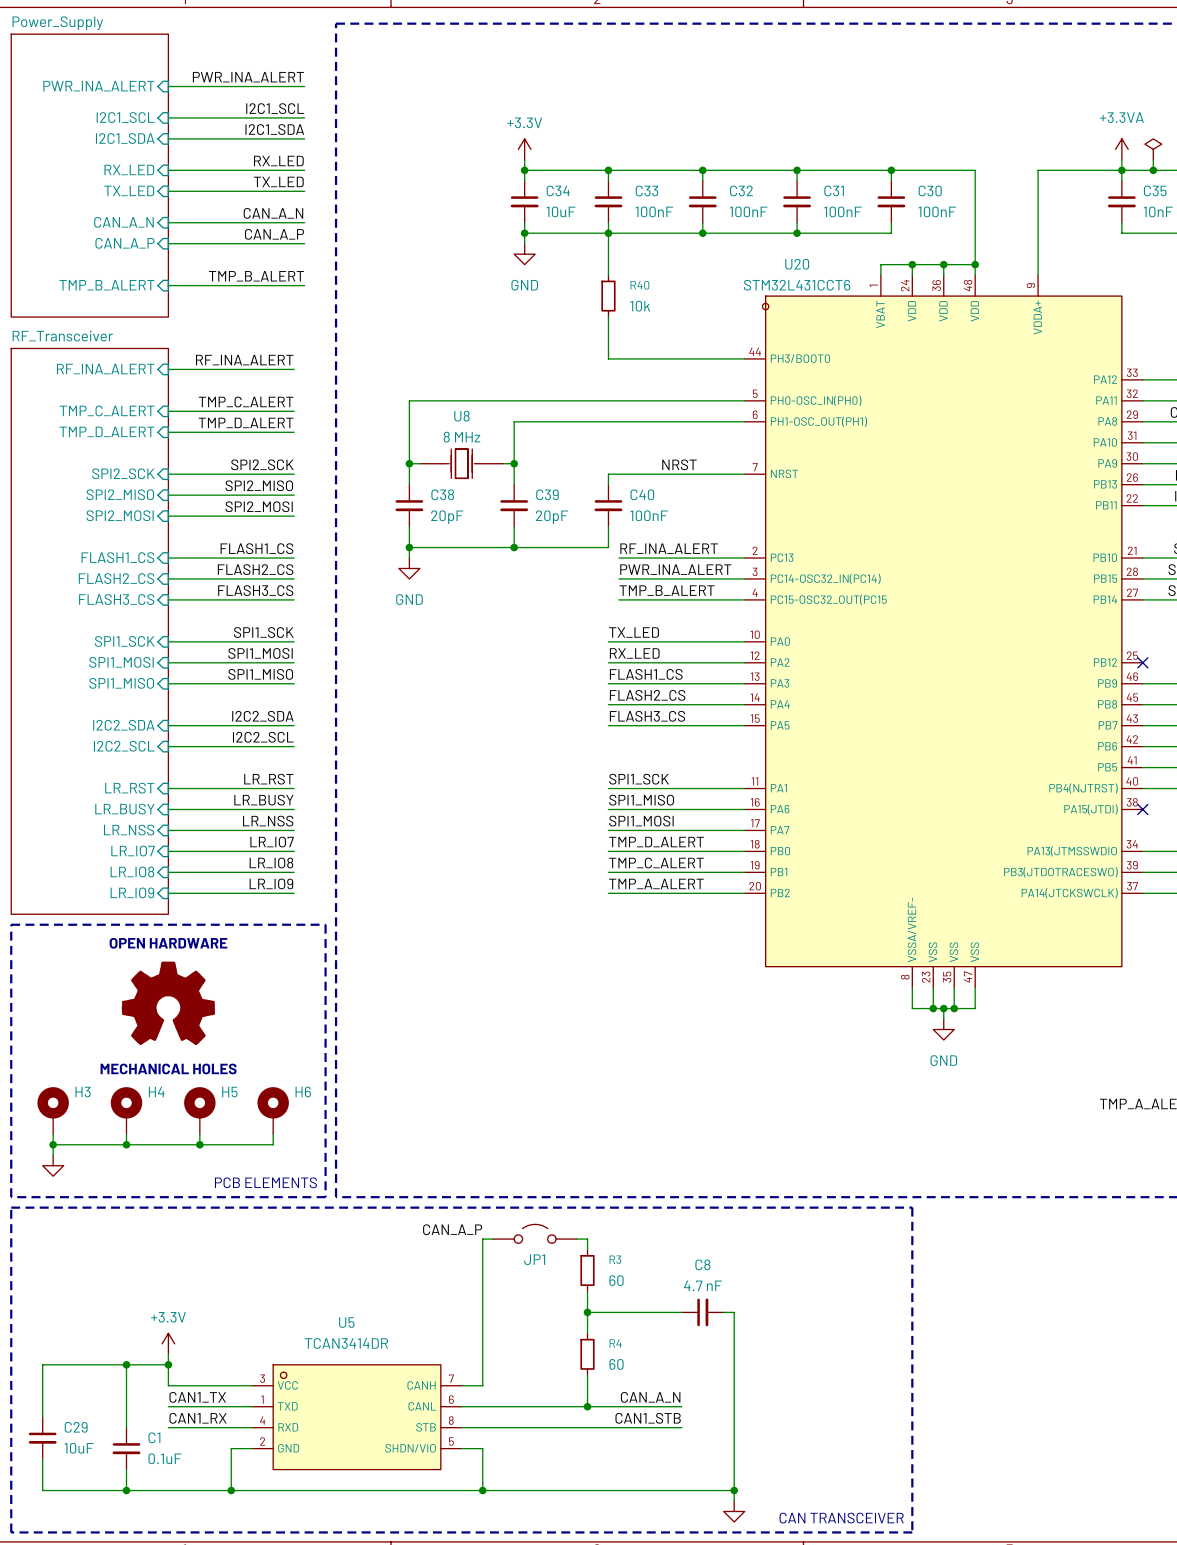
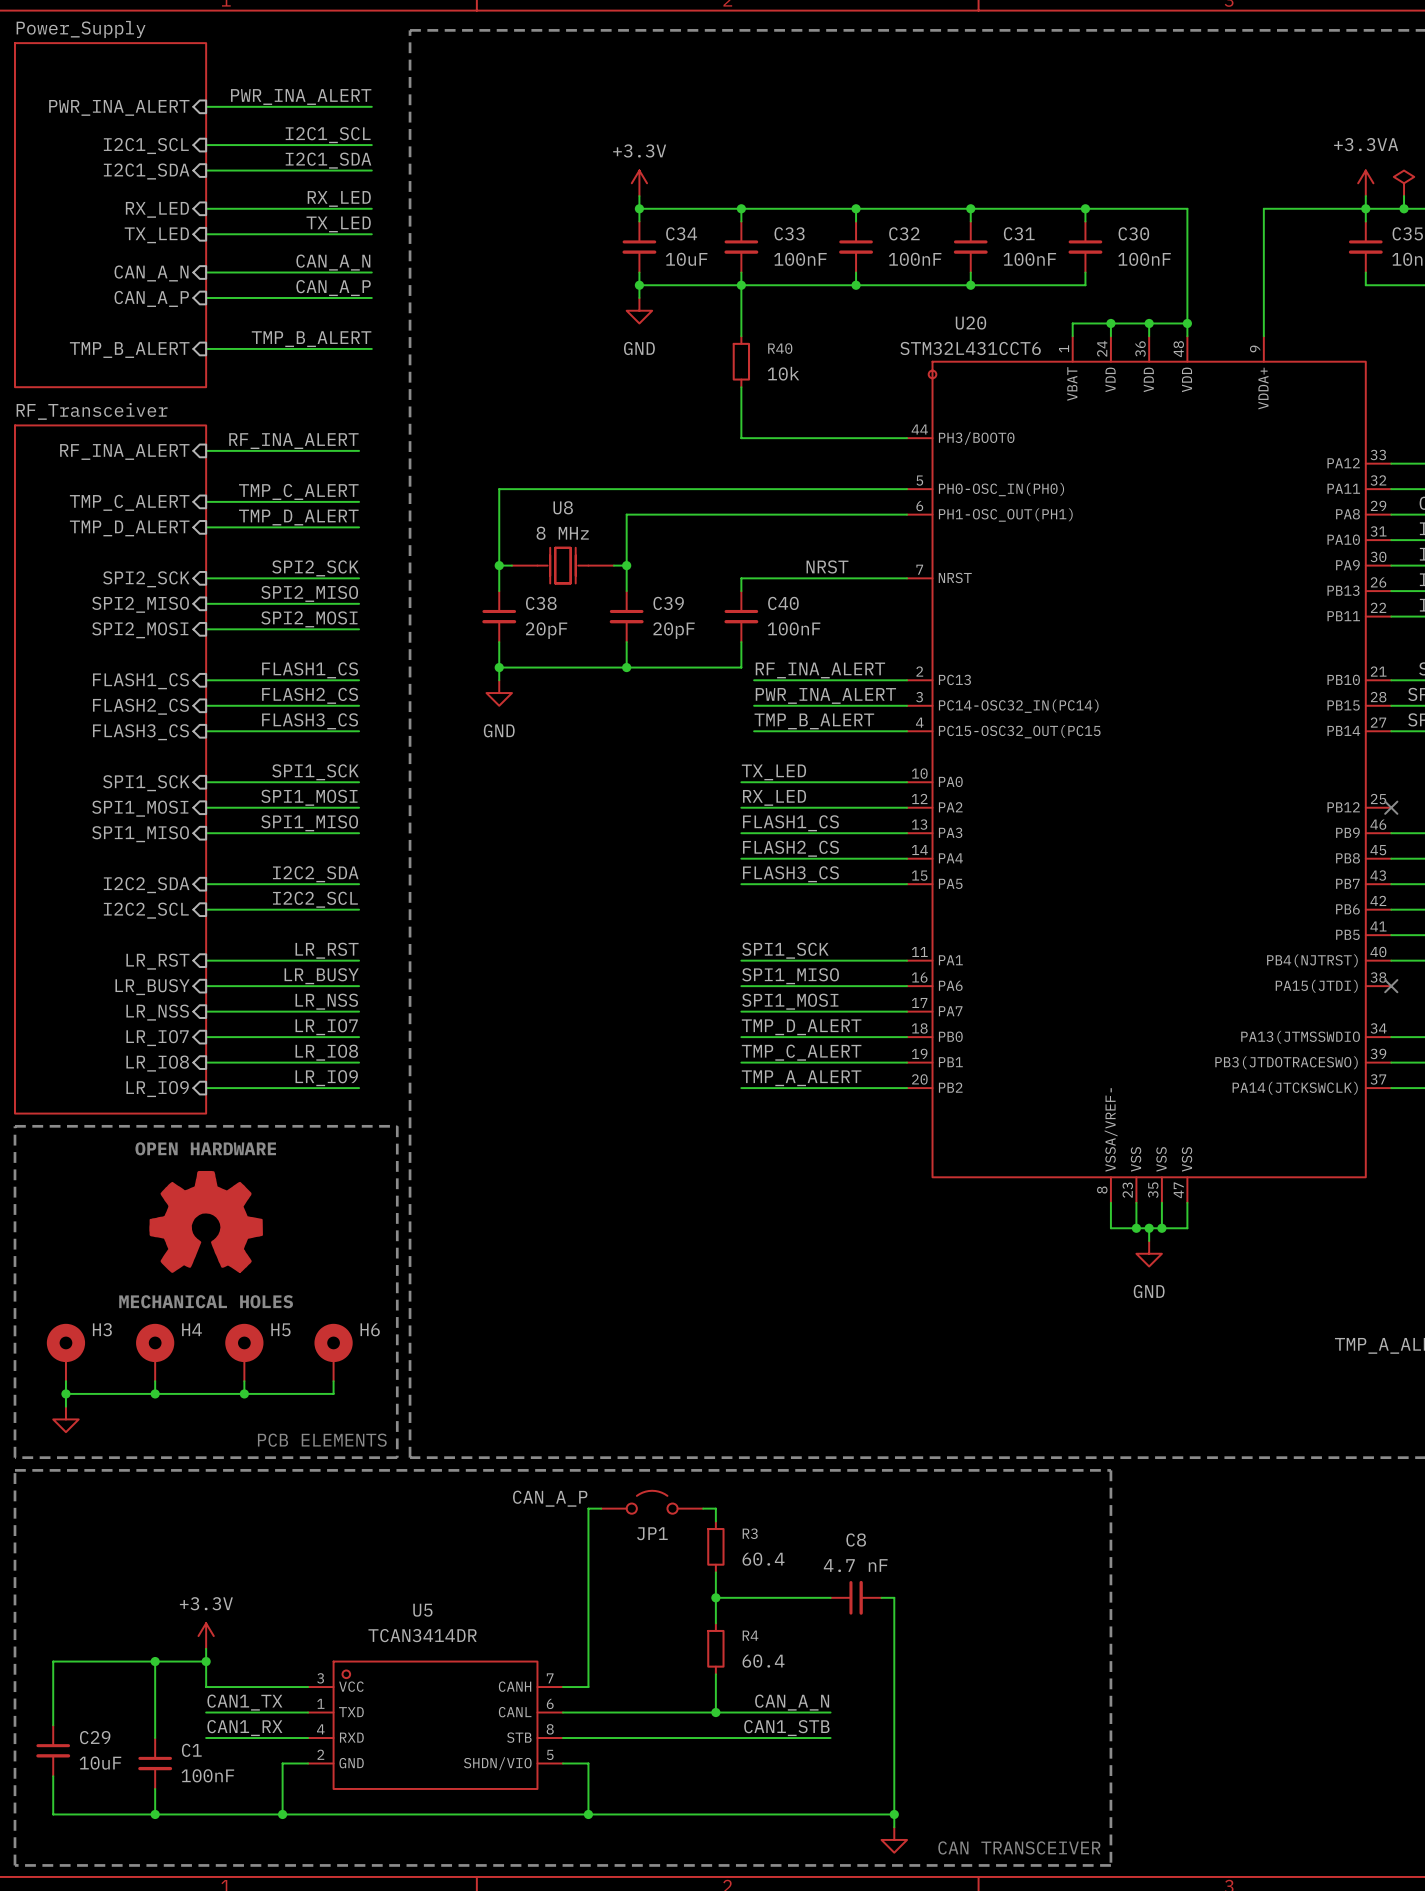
R3 value: 60 (616, 1280) -> 60.4 (763, 1559)
R4 value: 60 (616, 1364) -> 60.4 (763, 1661)
C1 value: 0.1uF (165, 1458) -> 100nF (207, 1775)

